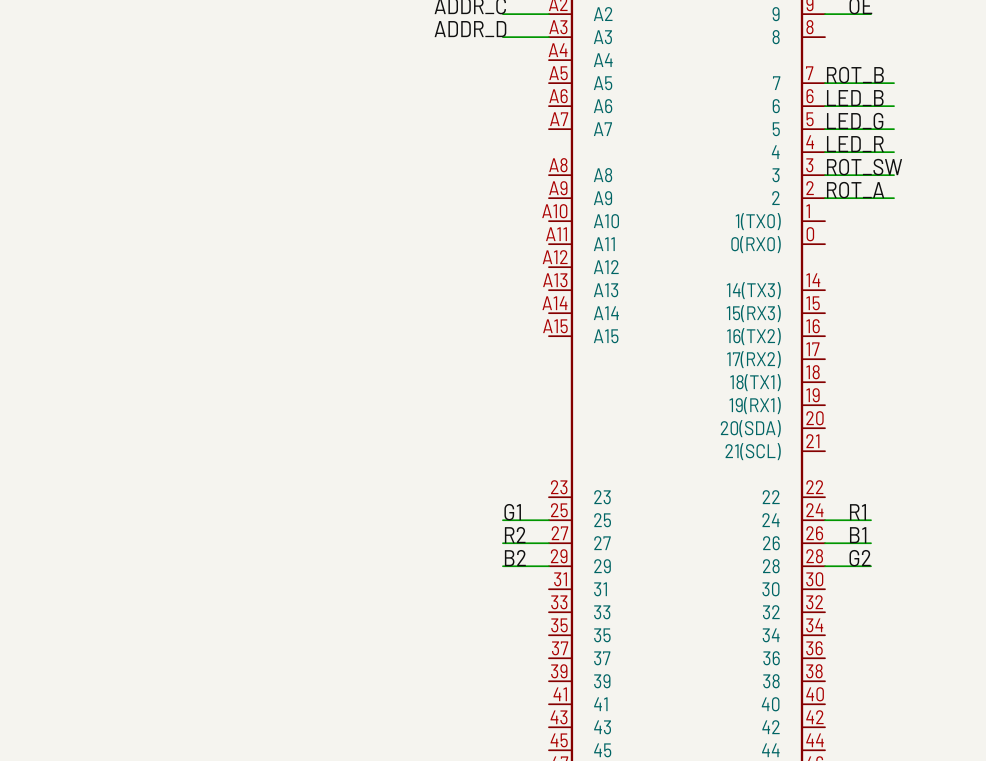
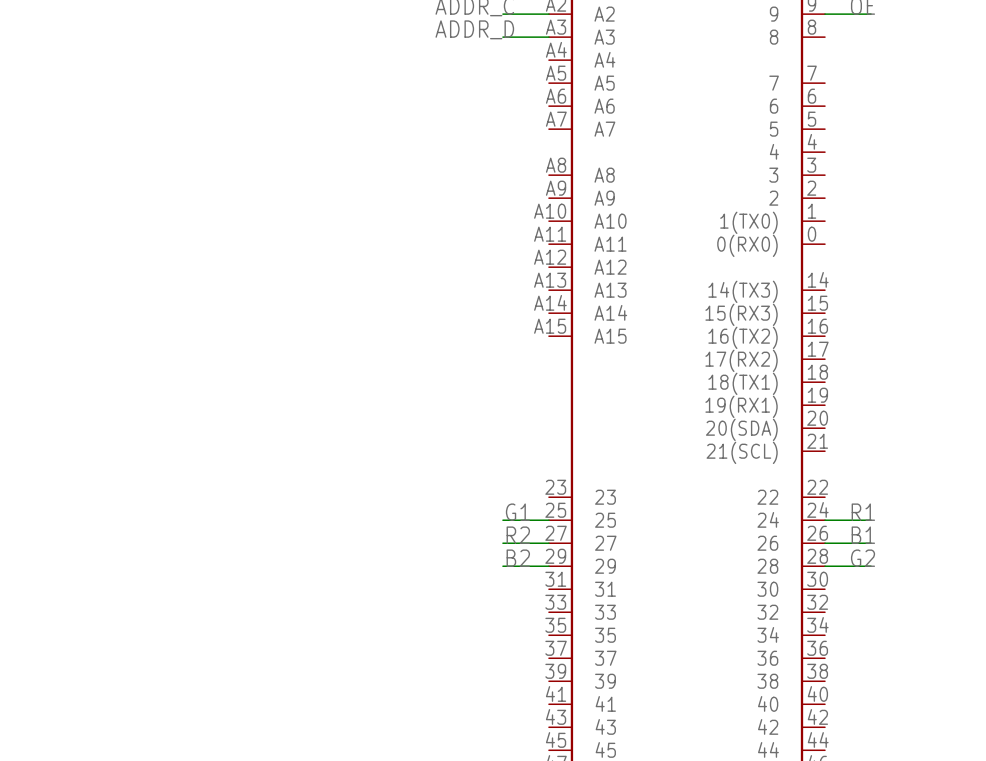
label: ROT_B (855, 75) -> none
wire: (825, 83) (894, 83) -> none
label: LED_B (855, 98) -> none
wire: (825, 106) (894, 106) -> none
label: LED_G (855, 121) -> none
wire: (825, 129) (894, 129) -> none
label: LED_R (855, 144) -> none
wire: (825, 152) (894, 152) -> none
label: ROT_SW (864, 167) -> none
wire: (825, 175) (894, 175) -> none
label: ROT_A (855, 190) -> none
wire: (825, 198) (894, 198) -> none

